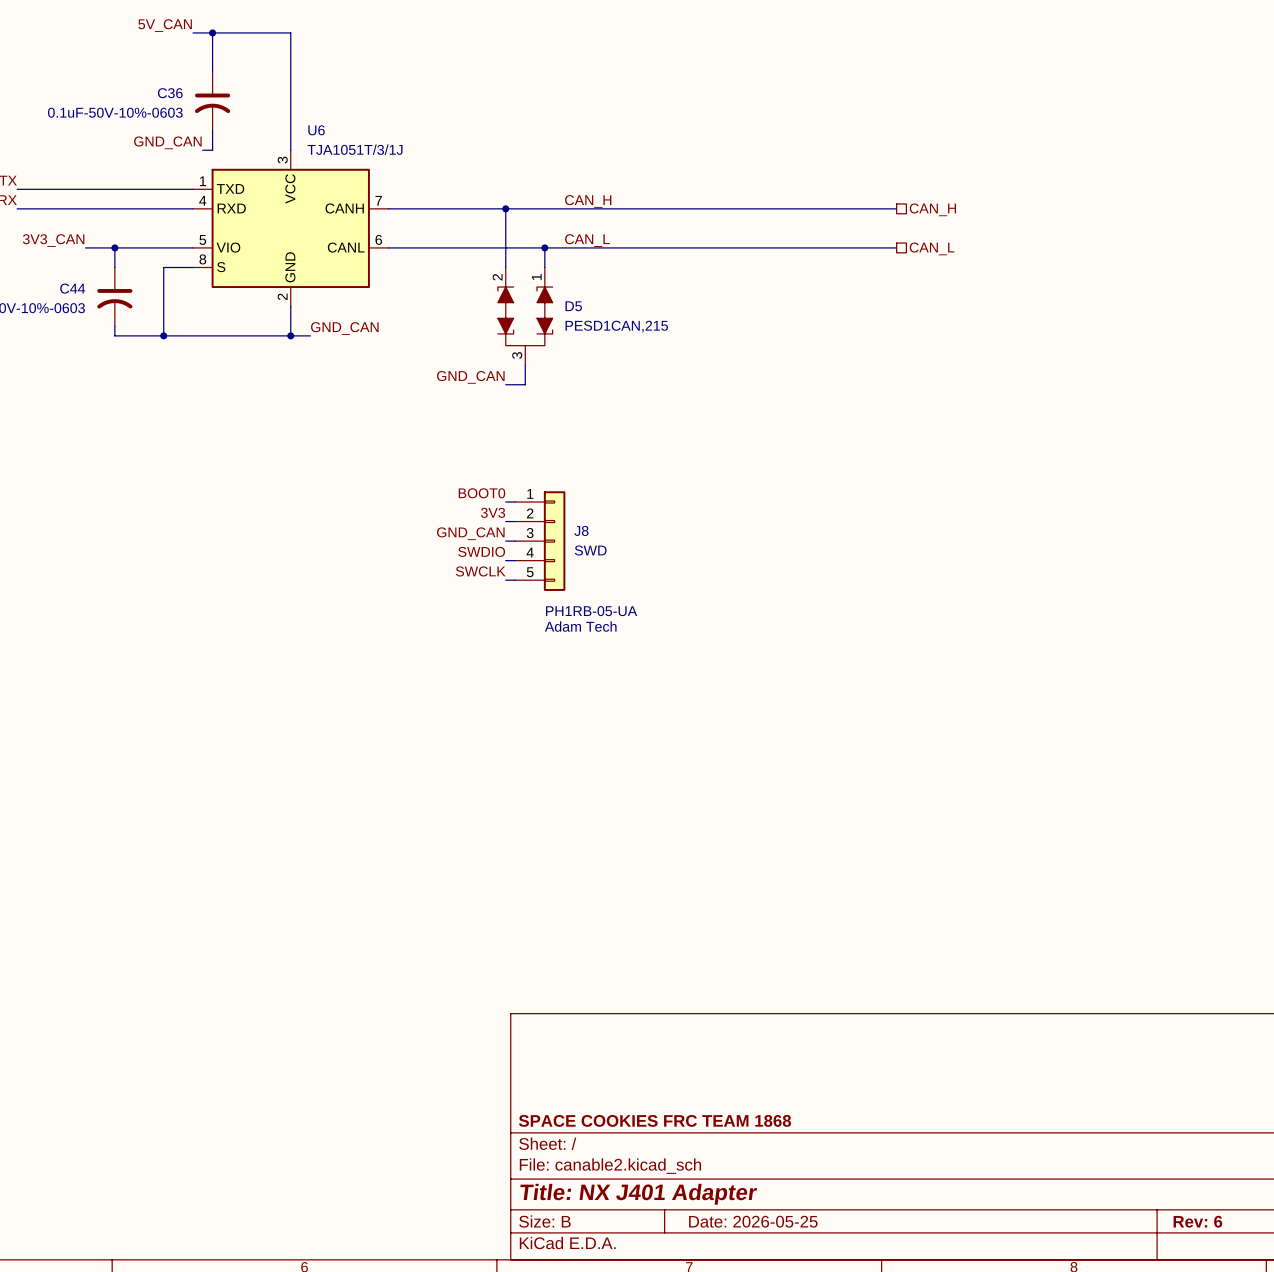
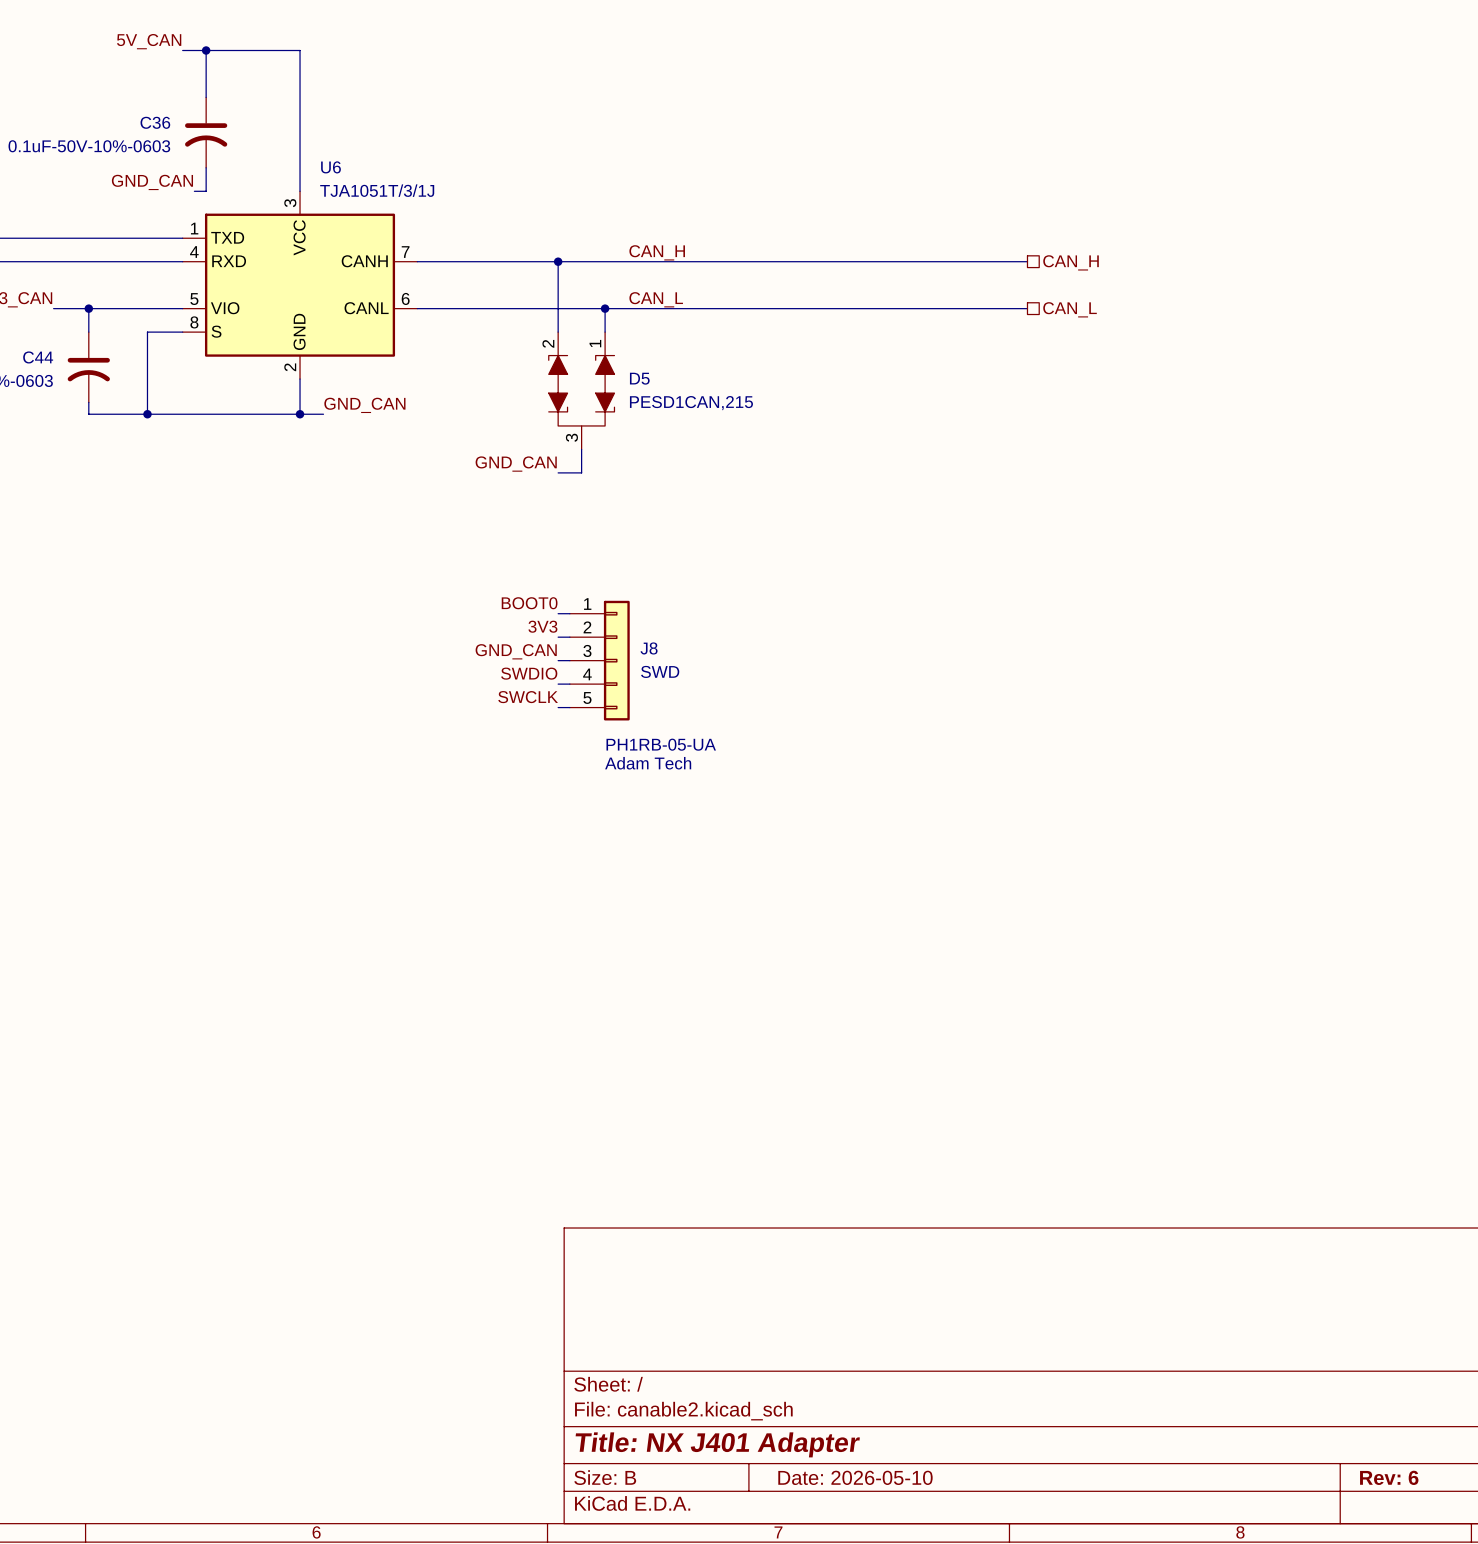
title block: SPACE COOKIES FRC TEAM 1868 (654, 1120) -> none
title block: Date: 2026-05-25 (753, 1221) -> Date: 2026-05-10 (855, 1477)

